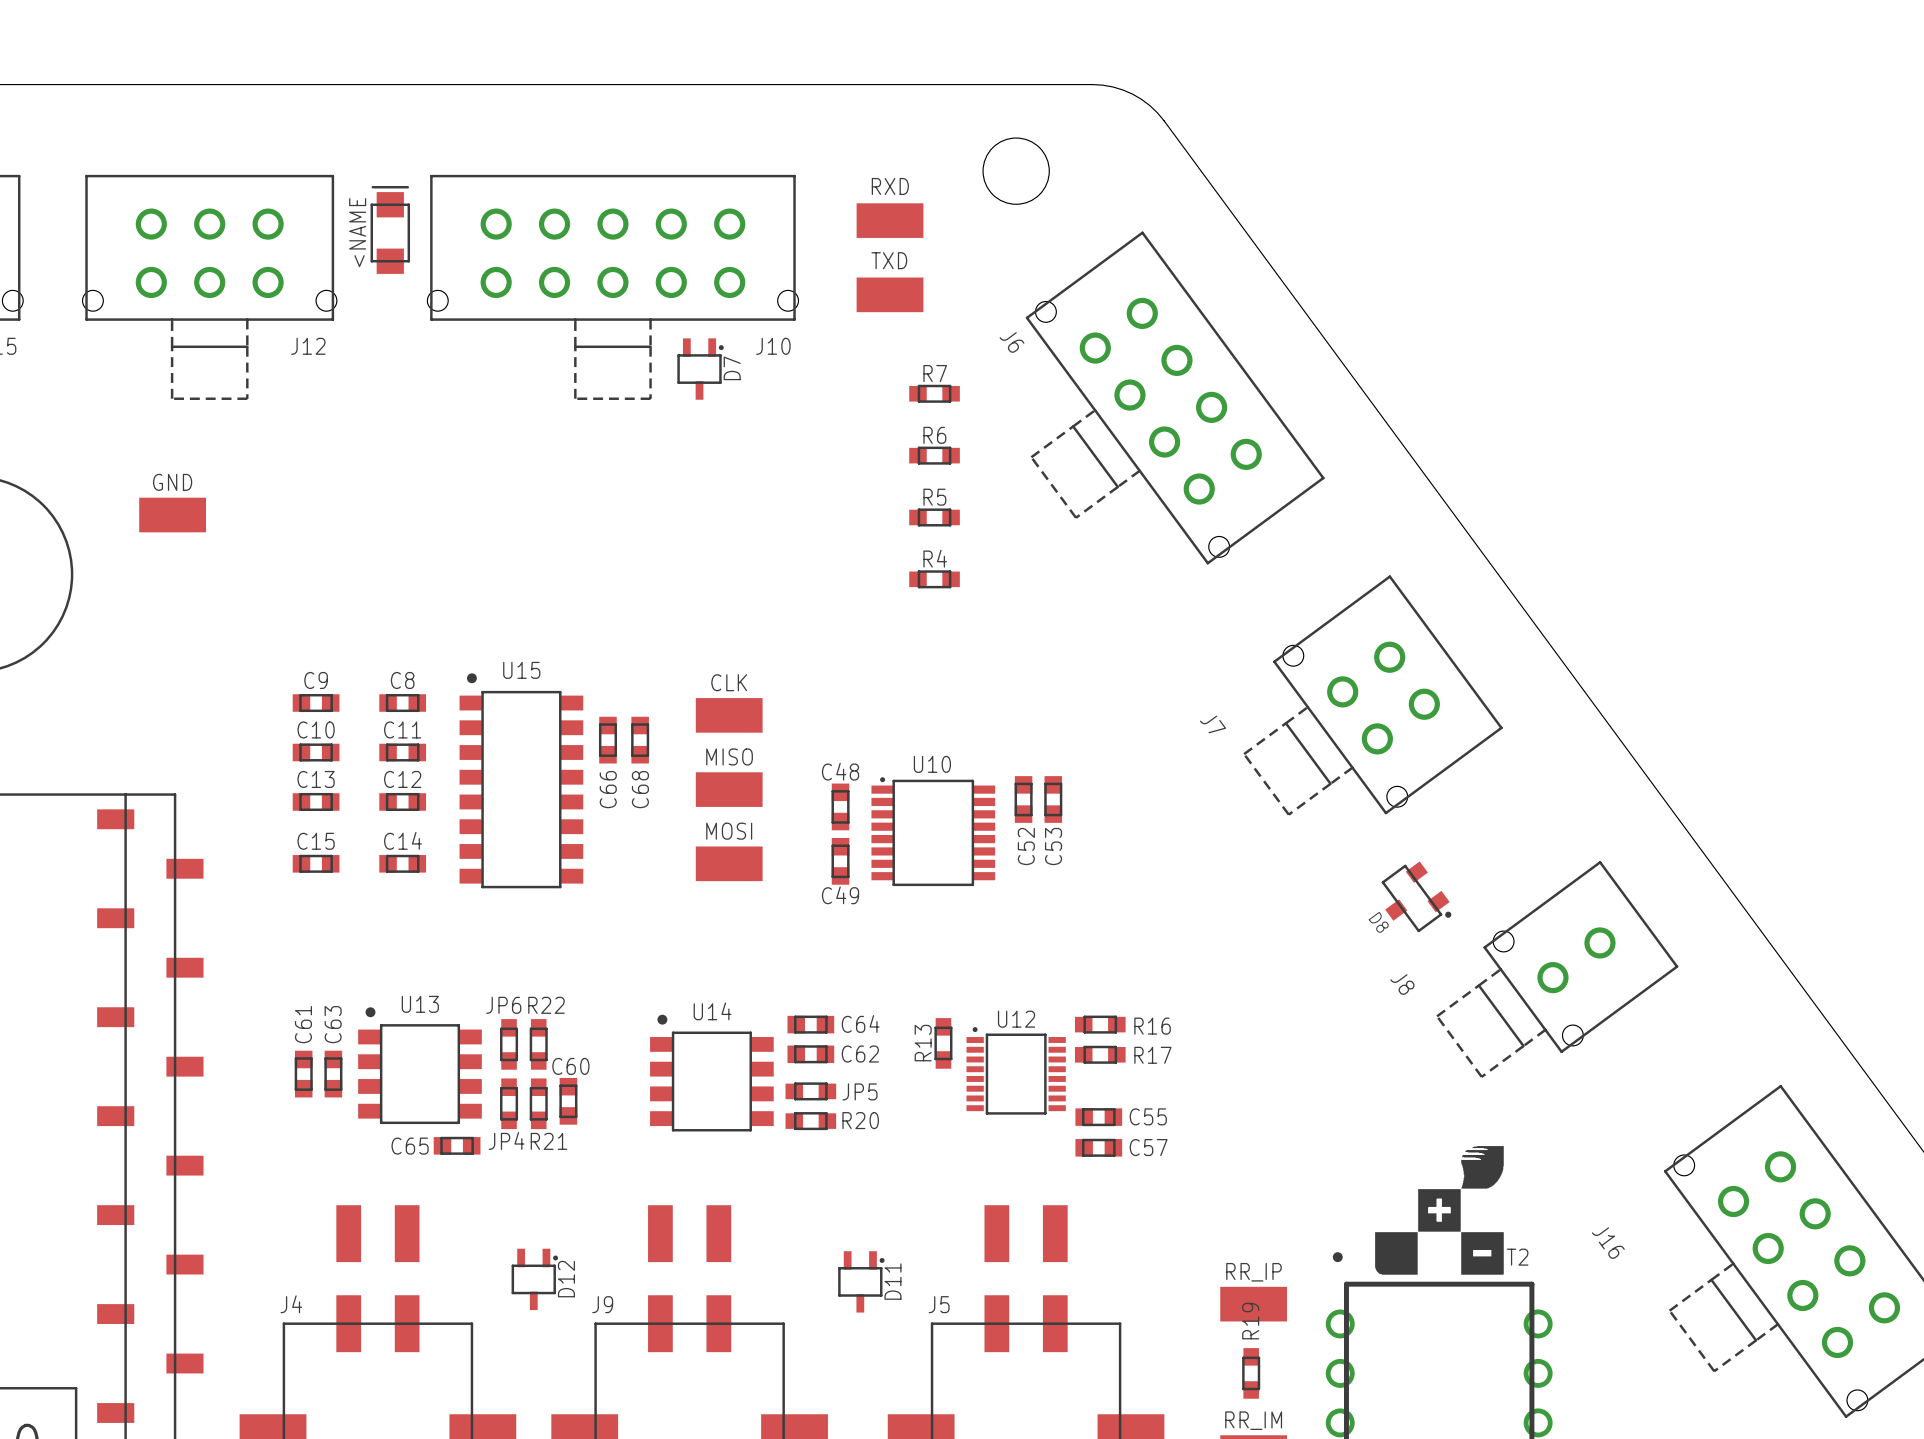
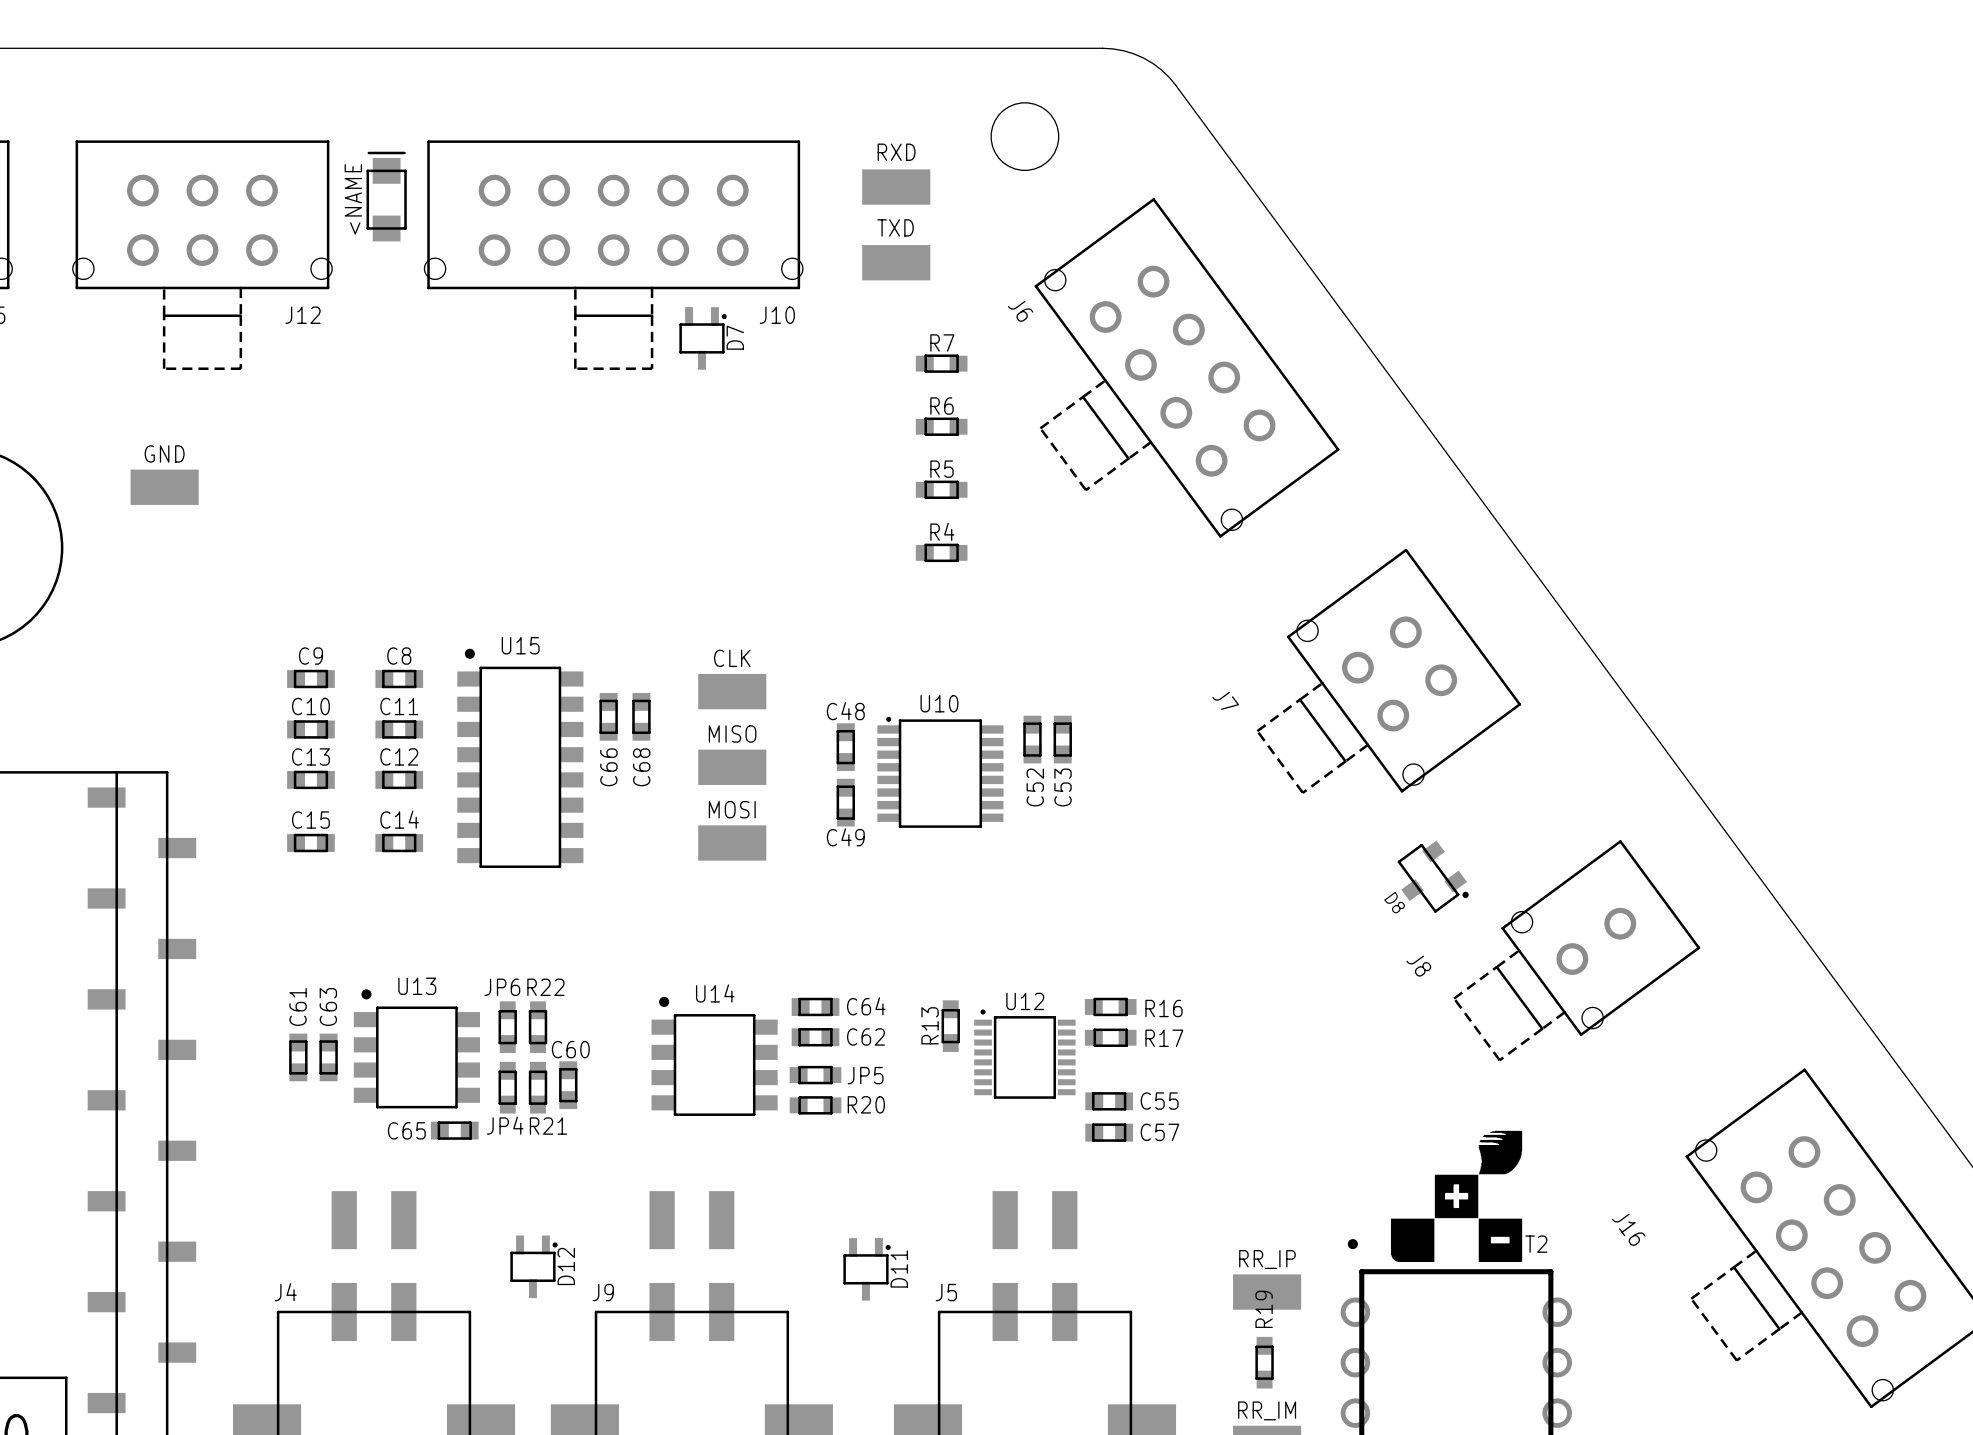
C52 position: (1023, 799) -> (1032, 739)
C53 position: (1053, 799) -> (1062, 739)
C48 position: (840, 806) -> (845, 747)
U10 position: (933, 831) -> (940, 772)
C49 position: (840, 861) -> (845, 802)

